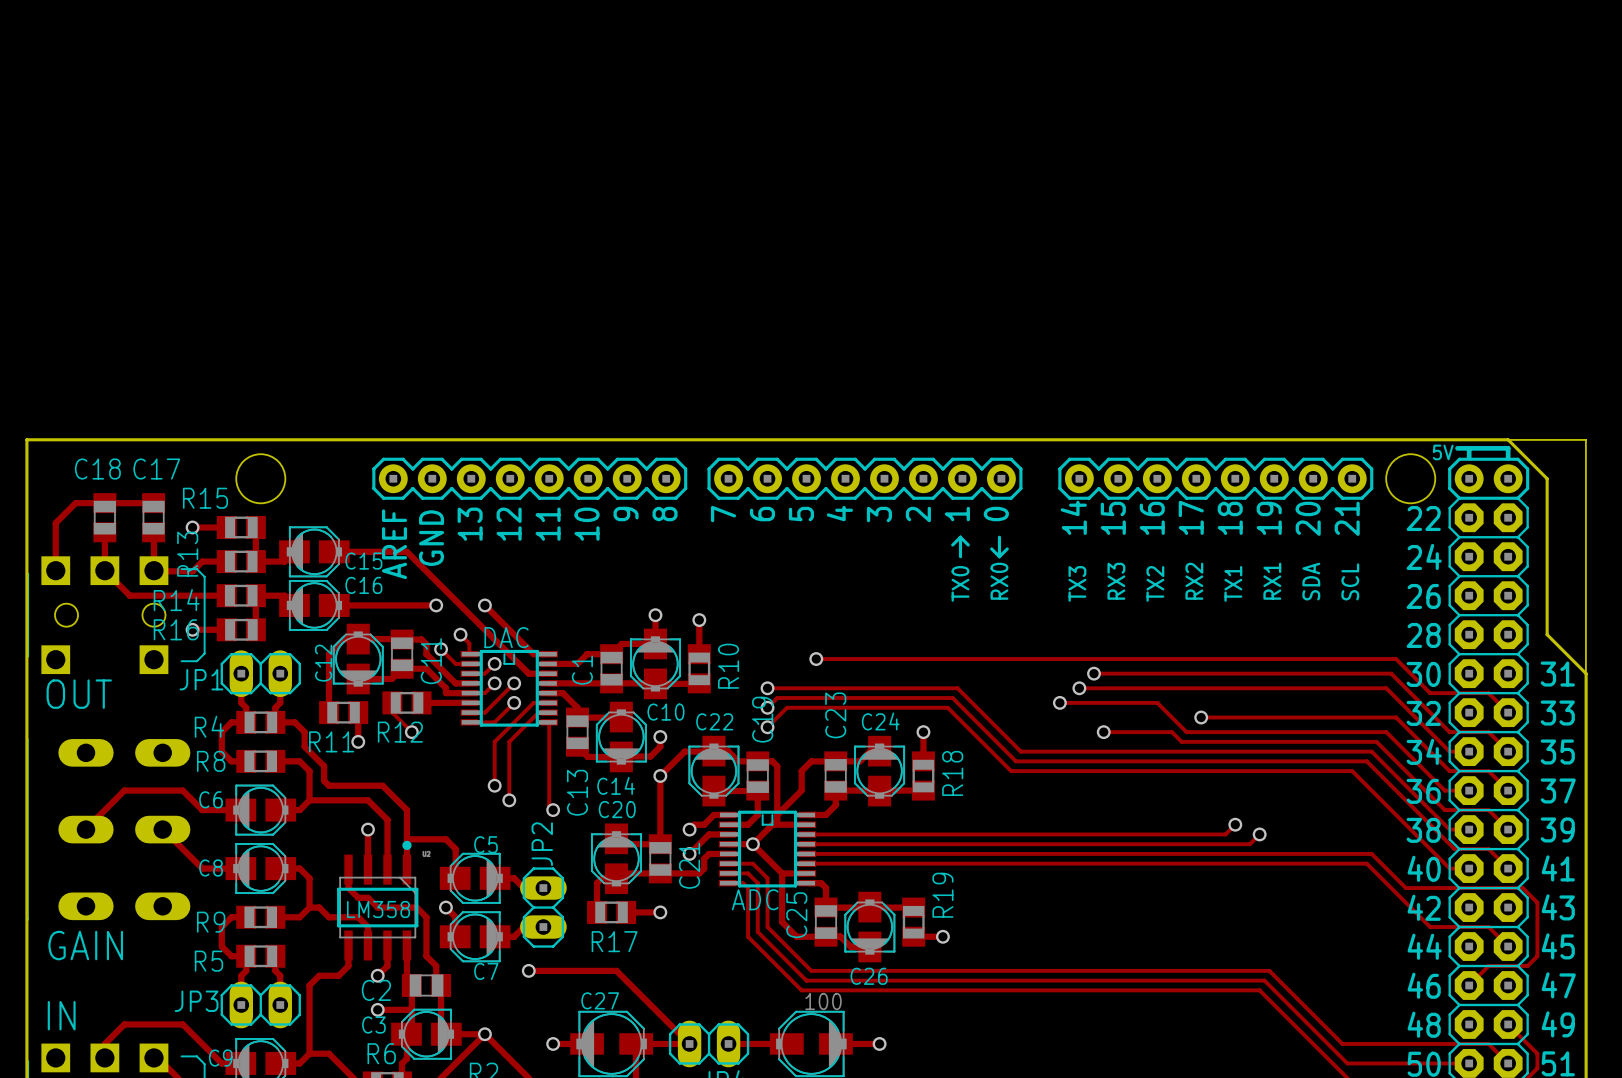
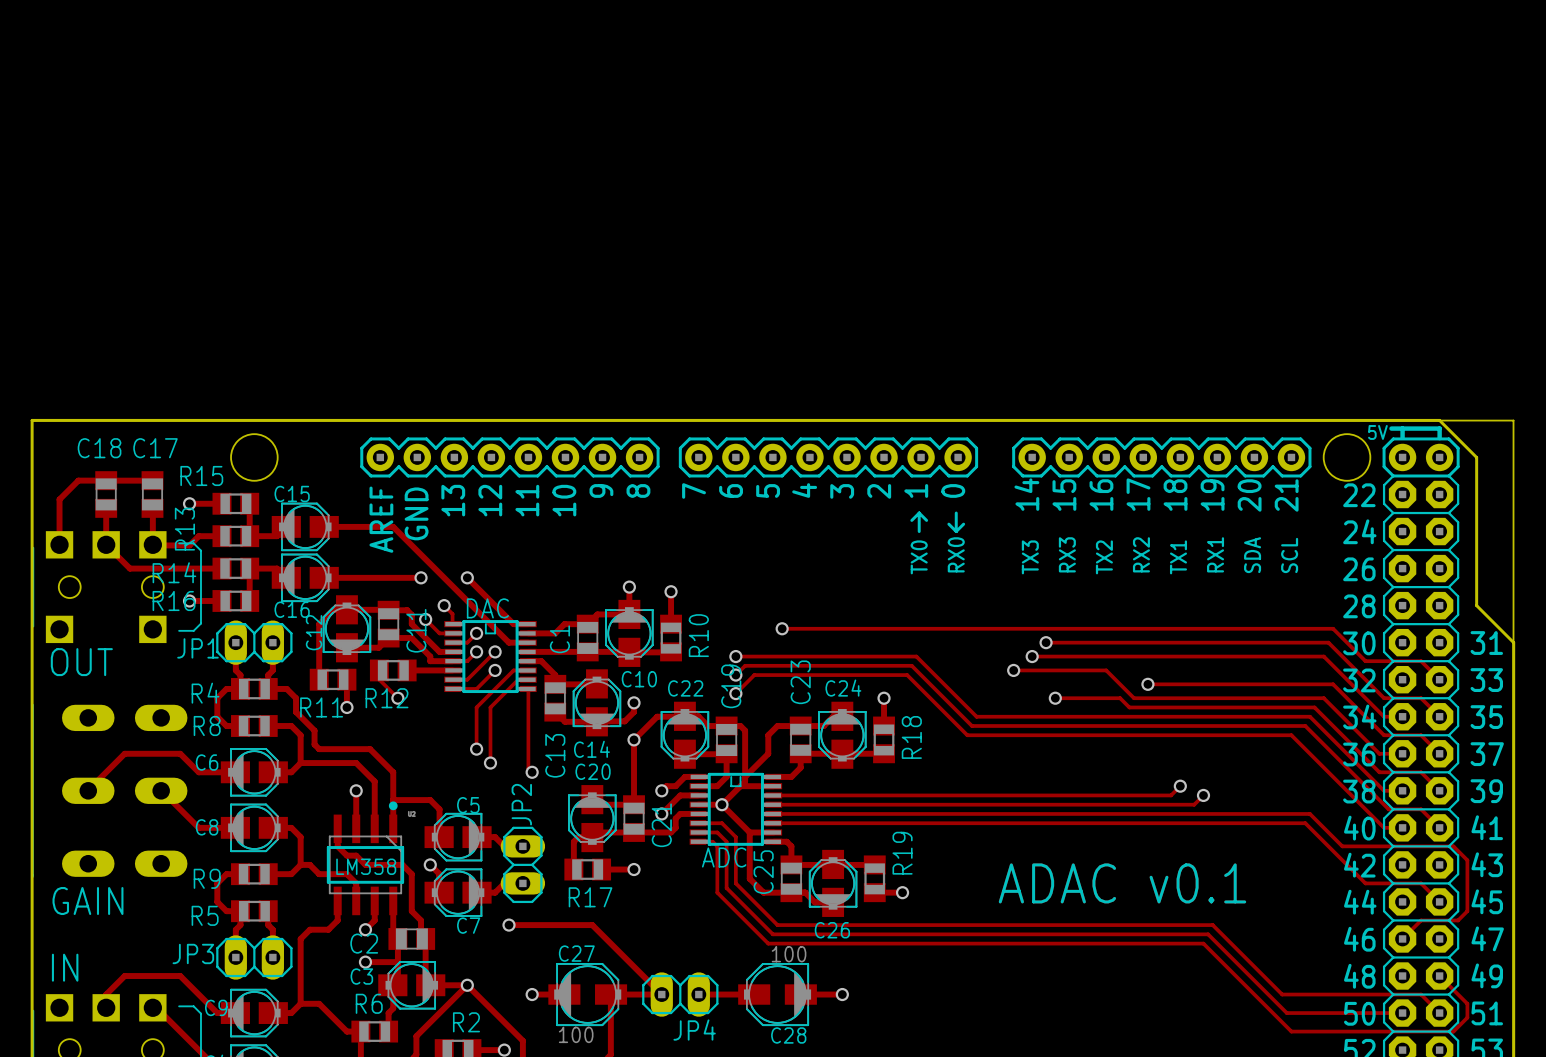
C15 name position: C15 (363, 561) -> C15 (292, 493)
C16 name position: C16 (363, 585) -> C16 (292, 609)
text: none -> ADAC v0.1 (1122, 883)

